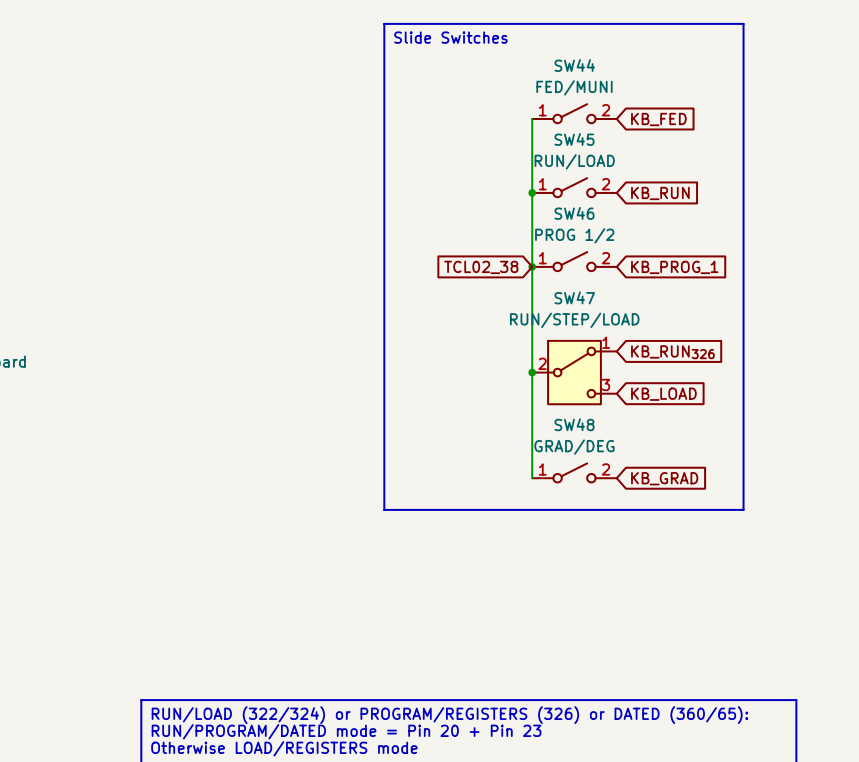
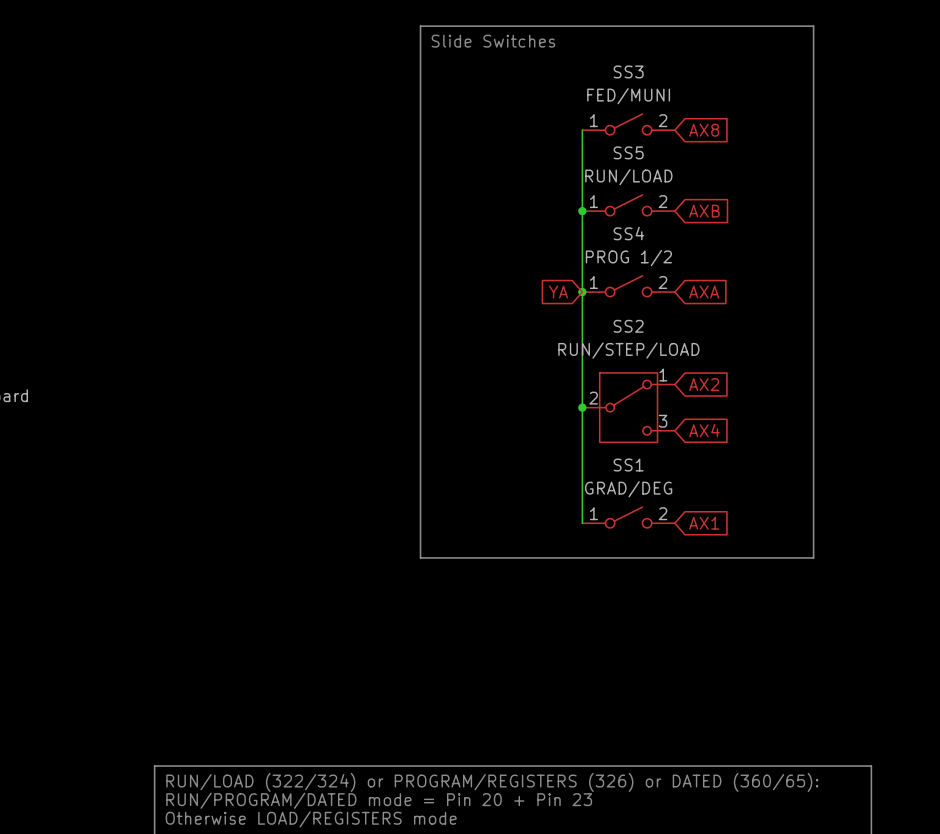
SW44 name: SW44 (574, 65) -> SS3 (628, 71)
global label: KB_FED (658, 119) -> AX8 (704, 130)
SW45 name: SW45 (574, 139) -> SS5 (628, 152)
global label: KB_RUN (660, 193) -> AXB (704, 211)
SW46 name: SW46 (574, 213) -> SS4 (628, 233)
global label: TCL02_38 (481, 267) -> YA (558, 292)
global label: KB_PROG_1 (674, 267) -> AXA (704, 292)
SW47 name: SW47 (574, 297) -> SS2 (628, 326)
global label: KB_RUN326 (672, 352) -> AX2 (704, 384)
global label: KB_LOAD (663, 394) -> AX4 (704, 430)
SW48 name: SW48 (574, 424) -> SS1 (628, 465)
global label: KB_GRAD (664, 478) -> AX1 (704, 523)

